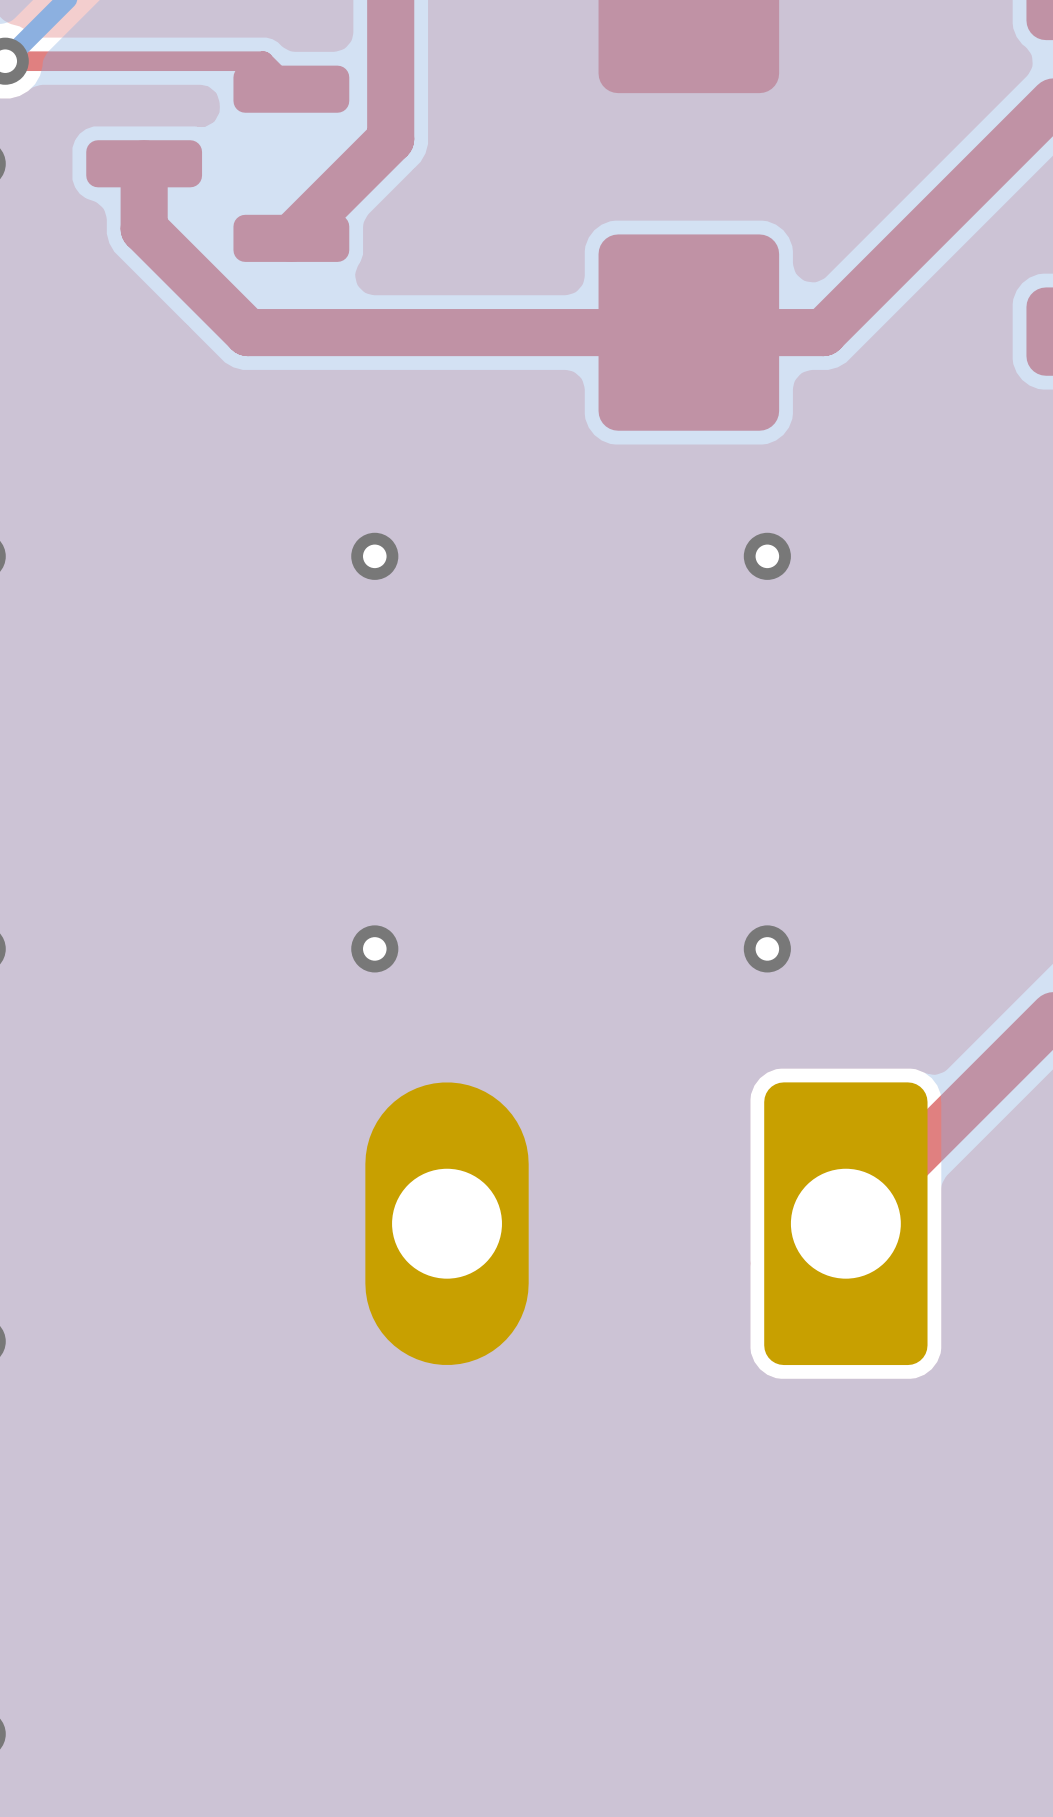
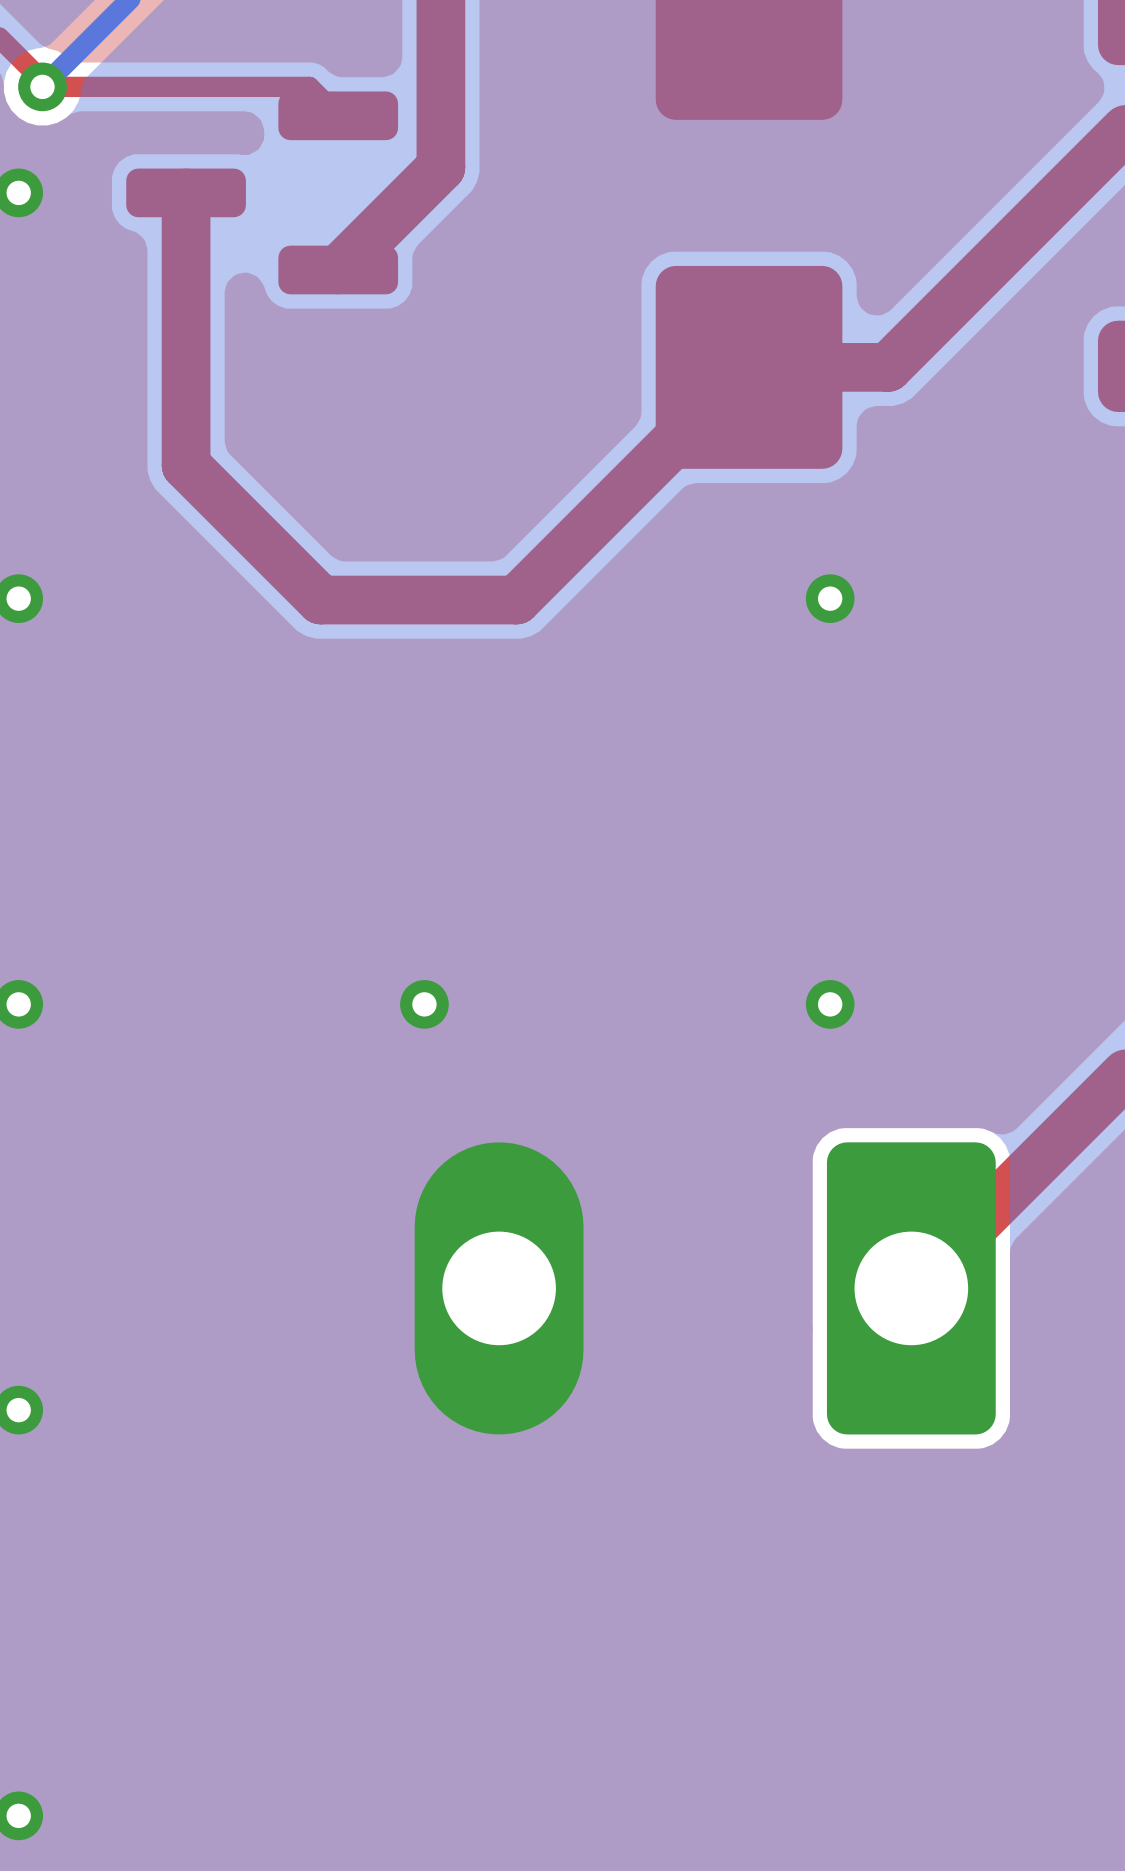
top track: (144, 228) (247, 332) (688, 332) -> (186, 260) (186, 465) (320, 600) (516, 600) (749, 367)
via: (374, 556) -> none

